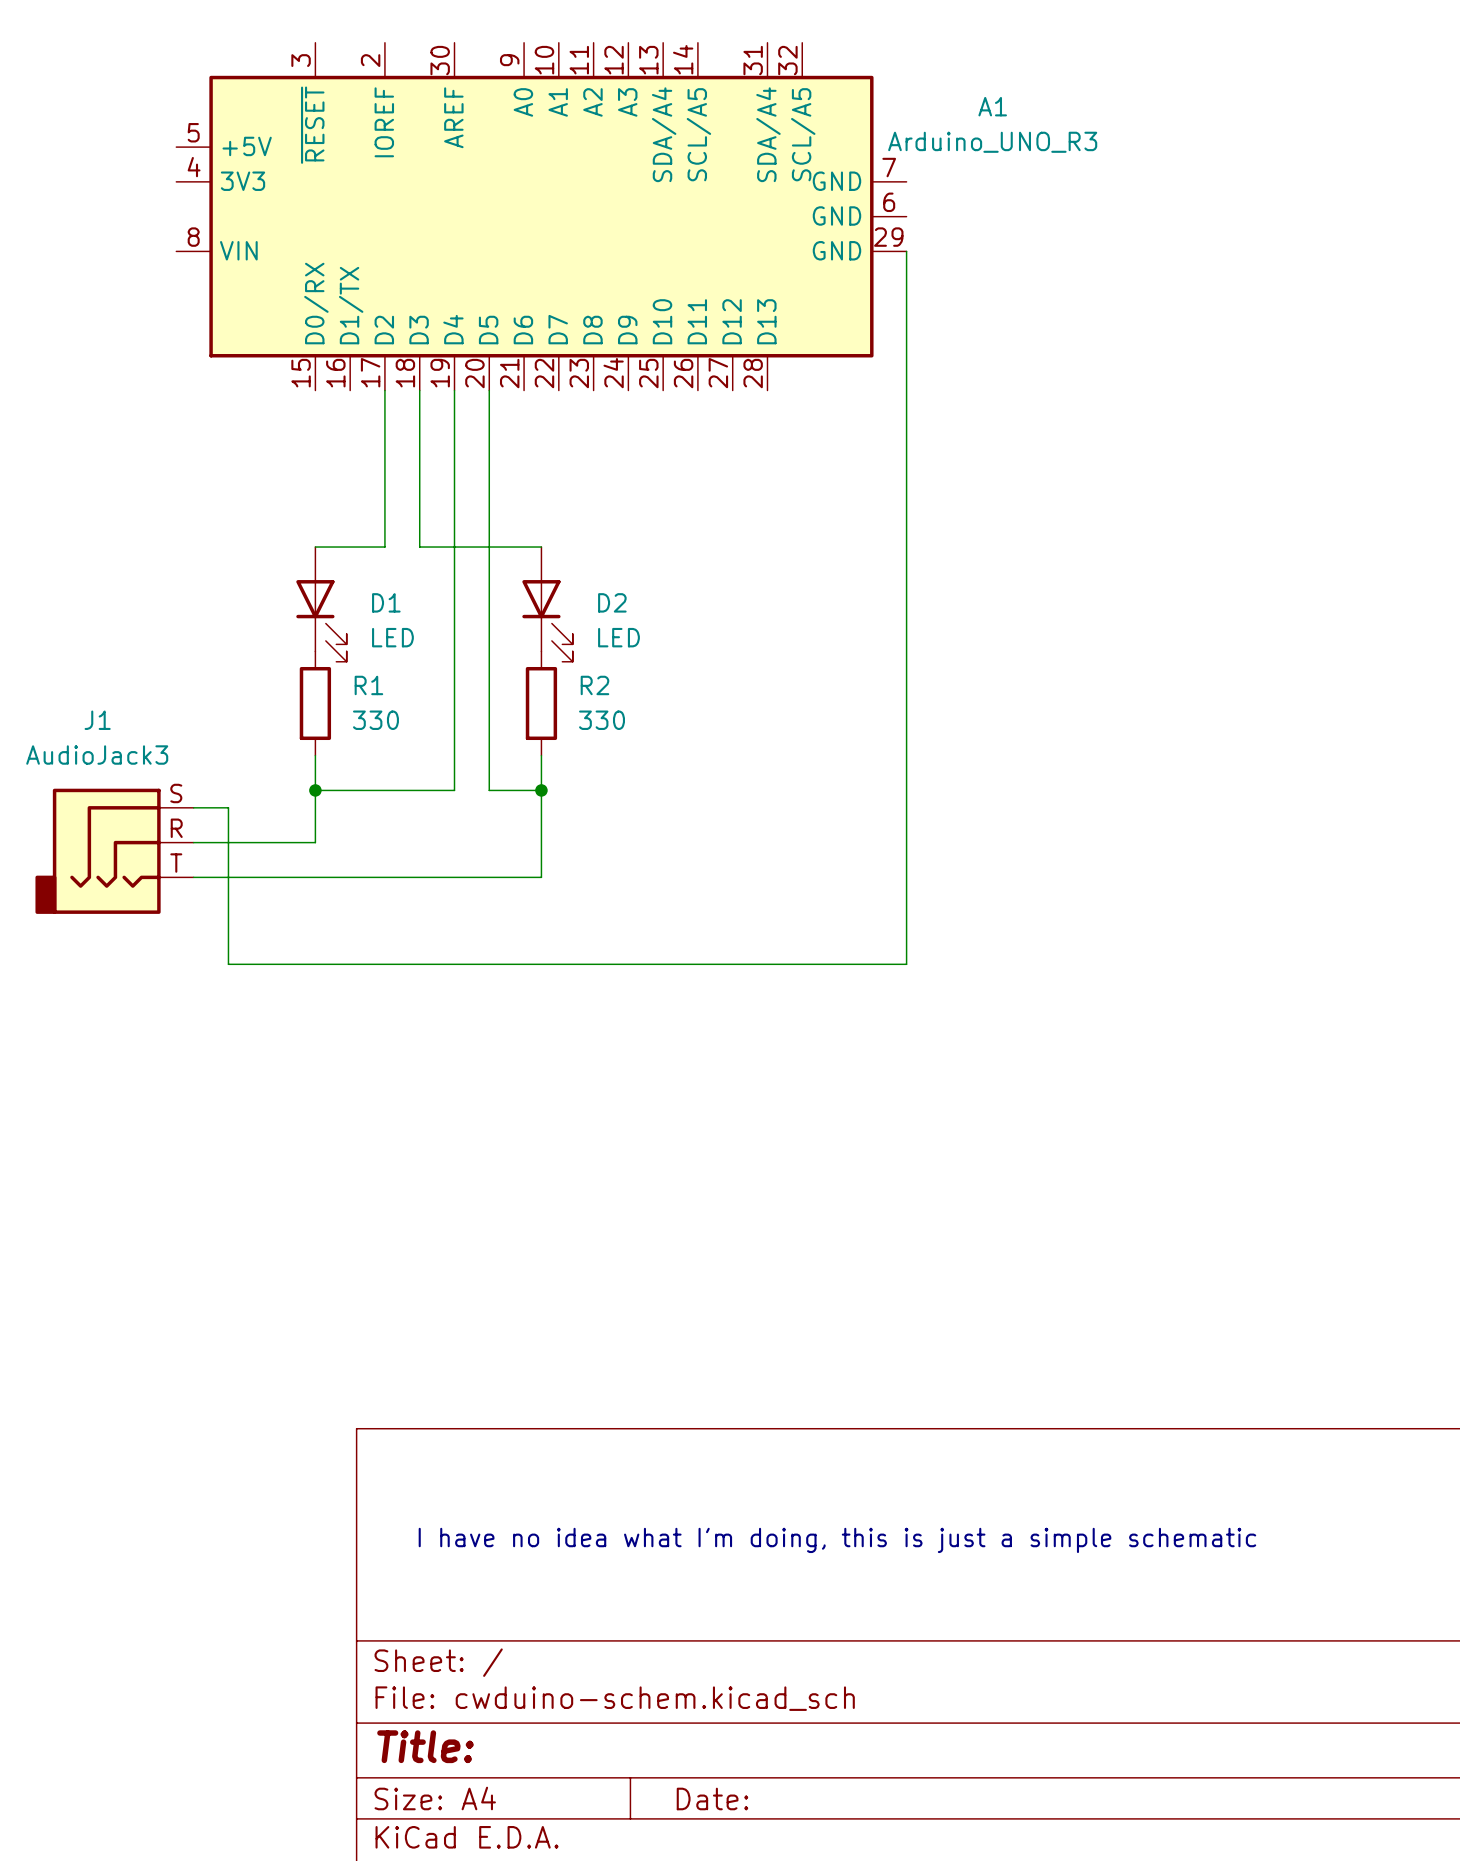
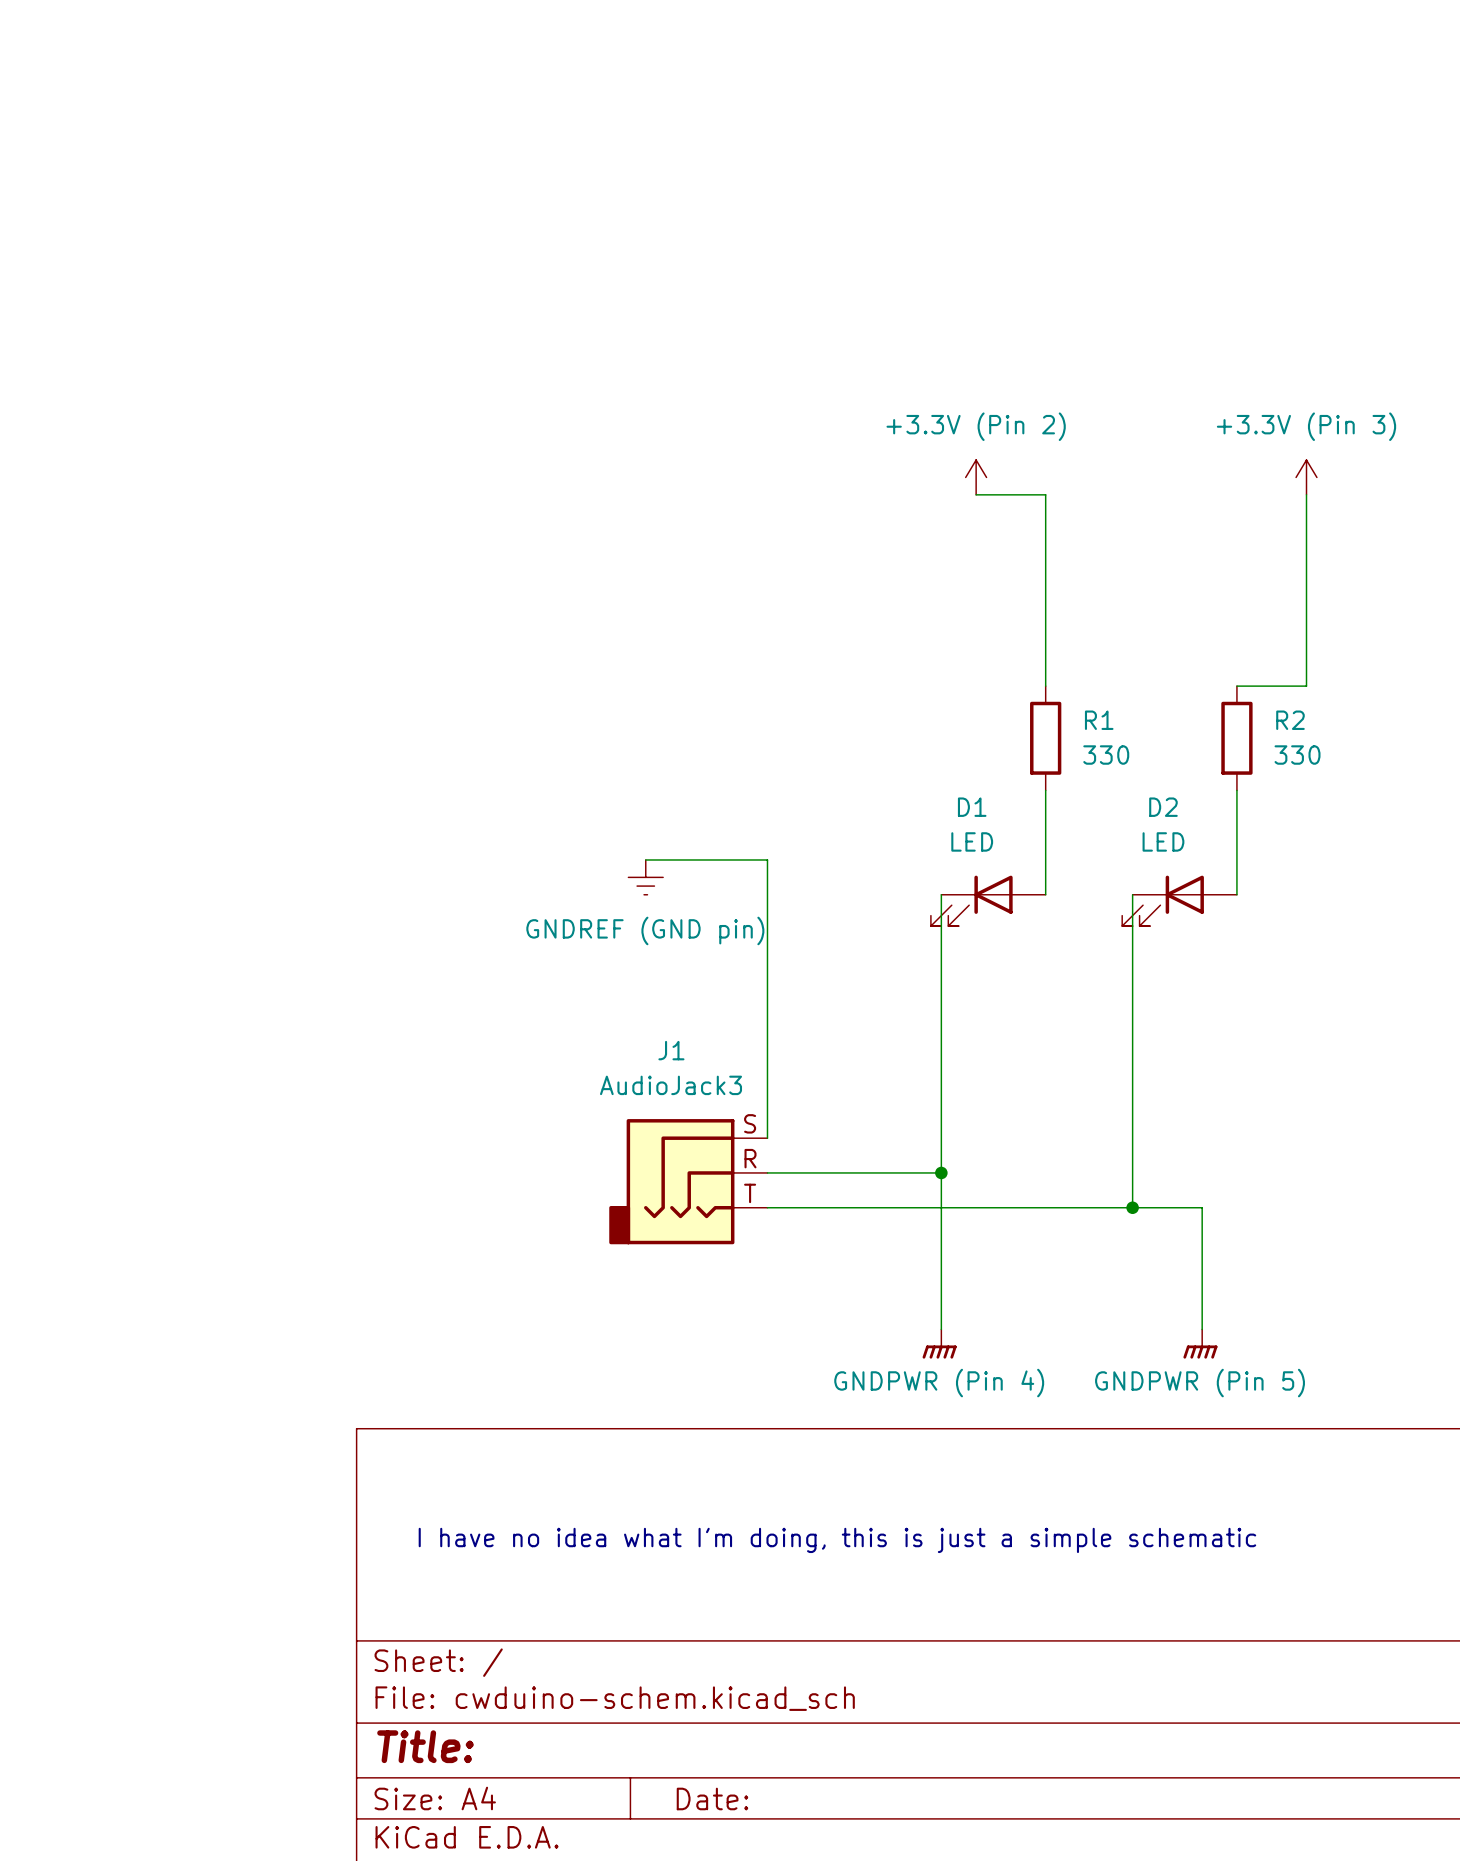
A1: Arduino_UNO_R3 (541, 216) -> none
wire: (906, 251) (906, 964) (228, 964) (228, 807) (193, 807) -> none
wire: (384, 390) (384, 547) (315, 547) -> none
wire: (419, 390) (419, 547) (541, 547) -> none
wire: (454, 390) (454, 790) (315, 790) -> none
wire: (489, 390) (489, 790) (541, 790) -> none
power symbol: none -> +3.3V (Pin 2) (976, 477)
power symbol: none -> +3.3V (Pin 3) (1306, 477)
wire: none -> (976, 494) (1045, 494) (1045, 686)
wire: none -> (1306, 494) (1306, 686) (1236, 686)
D1 name position: D1 (386, 602) -> D1 (972, 807)
D2 name position: D2 (612, 602) -> D2 (1163, 807)
D1 position: (321, 604) -> (988, 900)
D2 position: (547, 604) -> (1179, 900)
D1 rotation: 0° (321, 620) -> 90° clockwise (971, 900)
D2 rotation: 0° (547, 620) -> 90° clockwise (1163, 900)
D1 value position: LED (392, 637) -> LED (972, 841)
D2 value position: LED (618, 637) -> LED (1163, 841)
R1 position: (315, 703) -> (1045, 738)
R2 position: (541, 703) -> (1236, 738)
wire: (315, 755) (315, 842) (193, 842) -> none
wire: (541, 755) (541, 877) (193, 877) -> none
junction: (315, 790) -> none
junction: (541, 790) -> none
wire: none -> (1045, 790) (1045, 894)
wire: none -> (1236, 790) (1236, 894)
J1 position: (114, 851) -> (688, 1181)
wire: none -> (645, 859) (767, 859) (767, 1138)
power symbol: none -> GNDREF (GND pin) (645, 877)
wire: none -> (941, 894) (941, 1329)
wire: none -> (1132, 894) (1132, 1207)
wire: none -> (767, 1172) (941, 1172)
junction: none -> (941, 1172)
wire: none -> (767, 1207) (1202, 1207) (1202, 1329)
junction: none -> (1132, 1207)
power symbol: none -> GNDPWR (Pin 4) (939, 1344)
power symbol: none -> GNDPWR (Pin 5) (1200, 1344)

